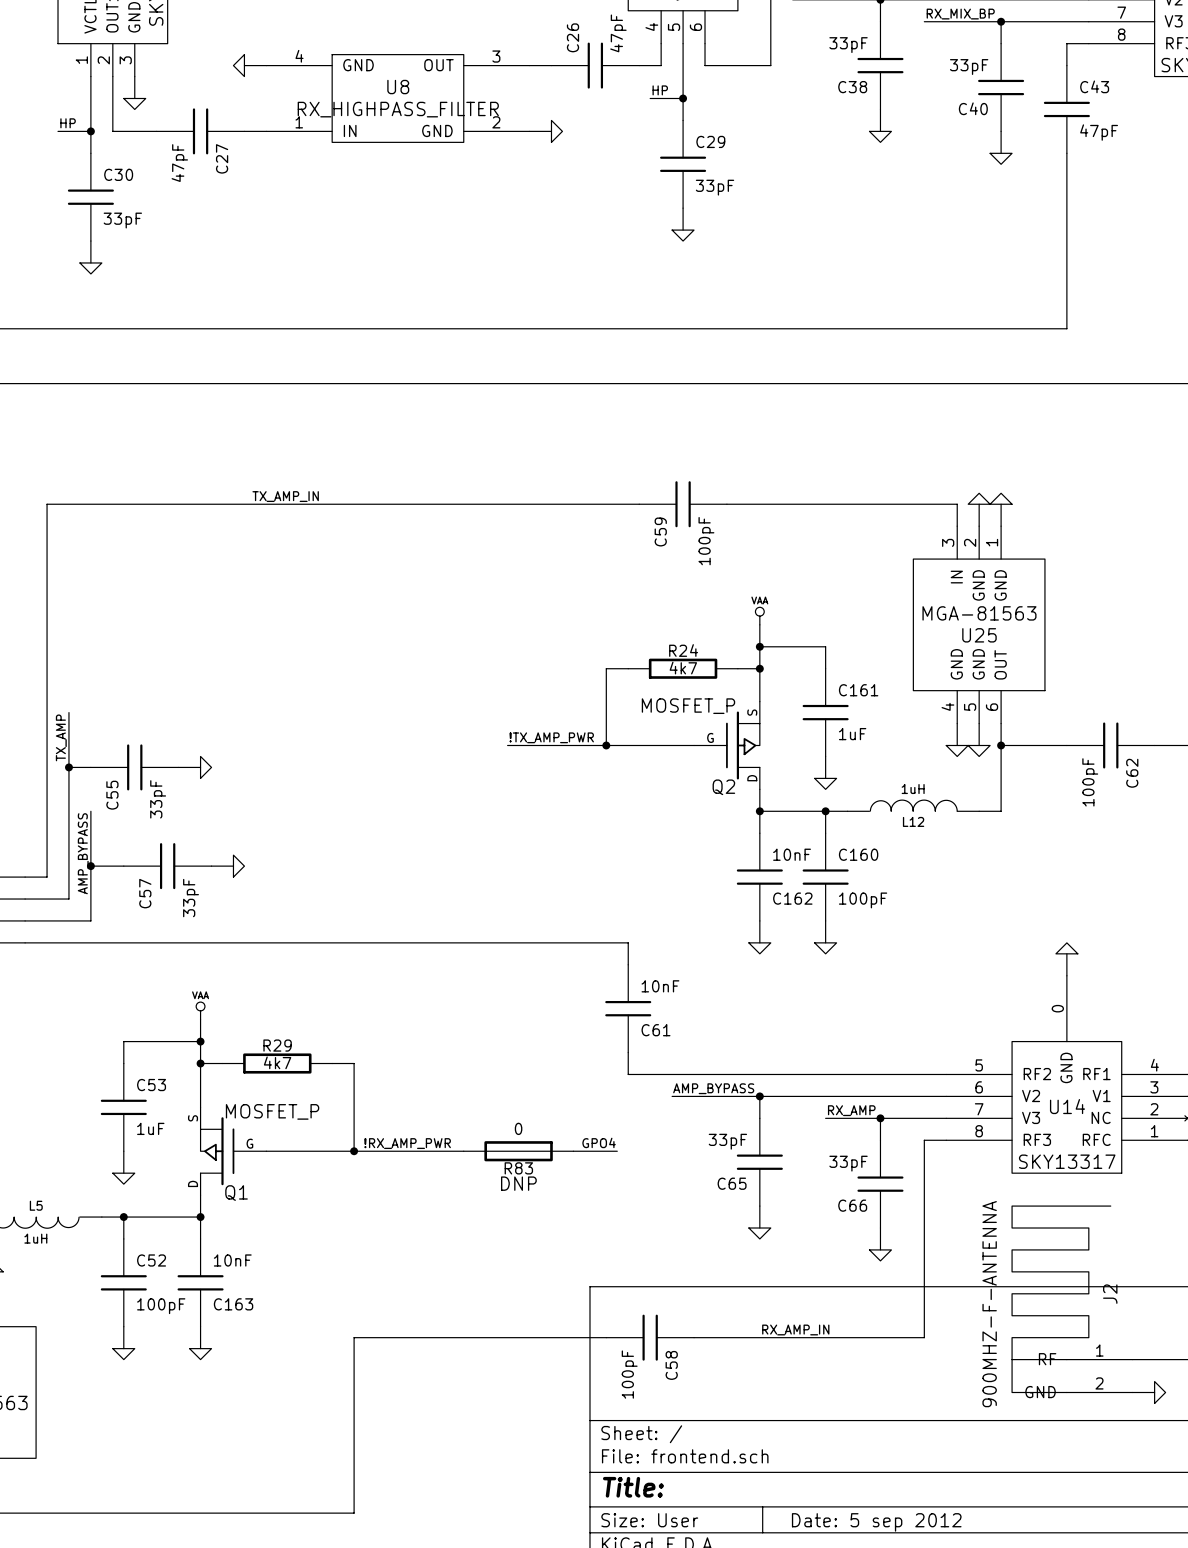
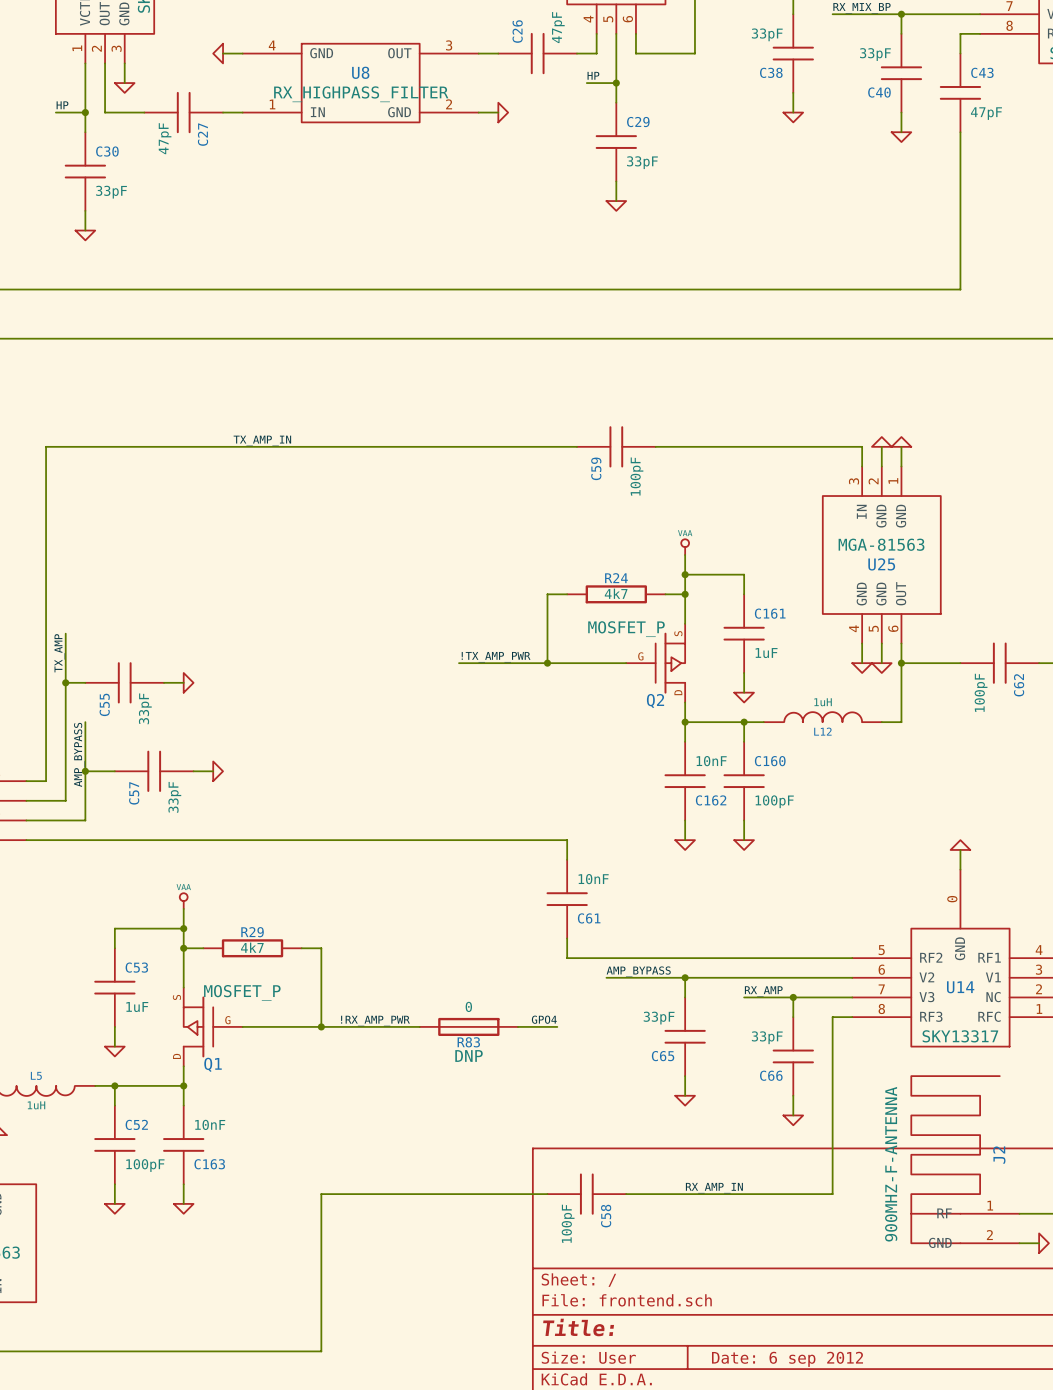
title block: Date: 5 sep 2012 (876, 1522) -> Date: 6 sep 2012 (787, 1359)

